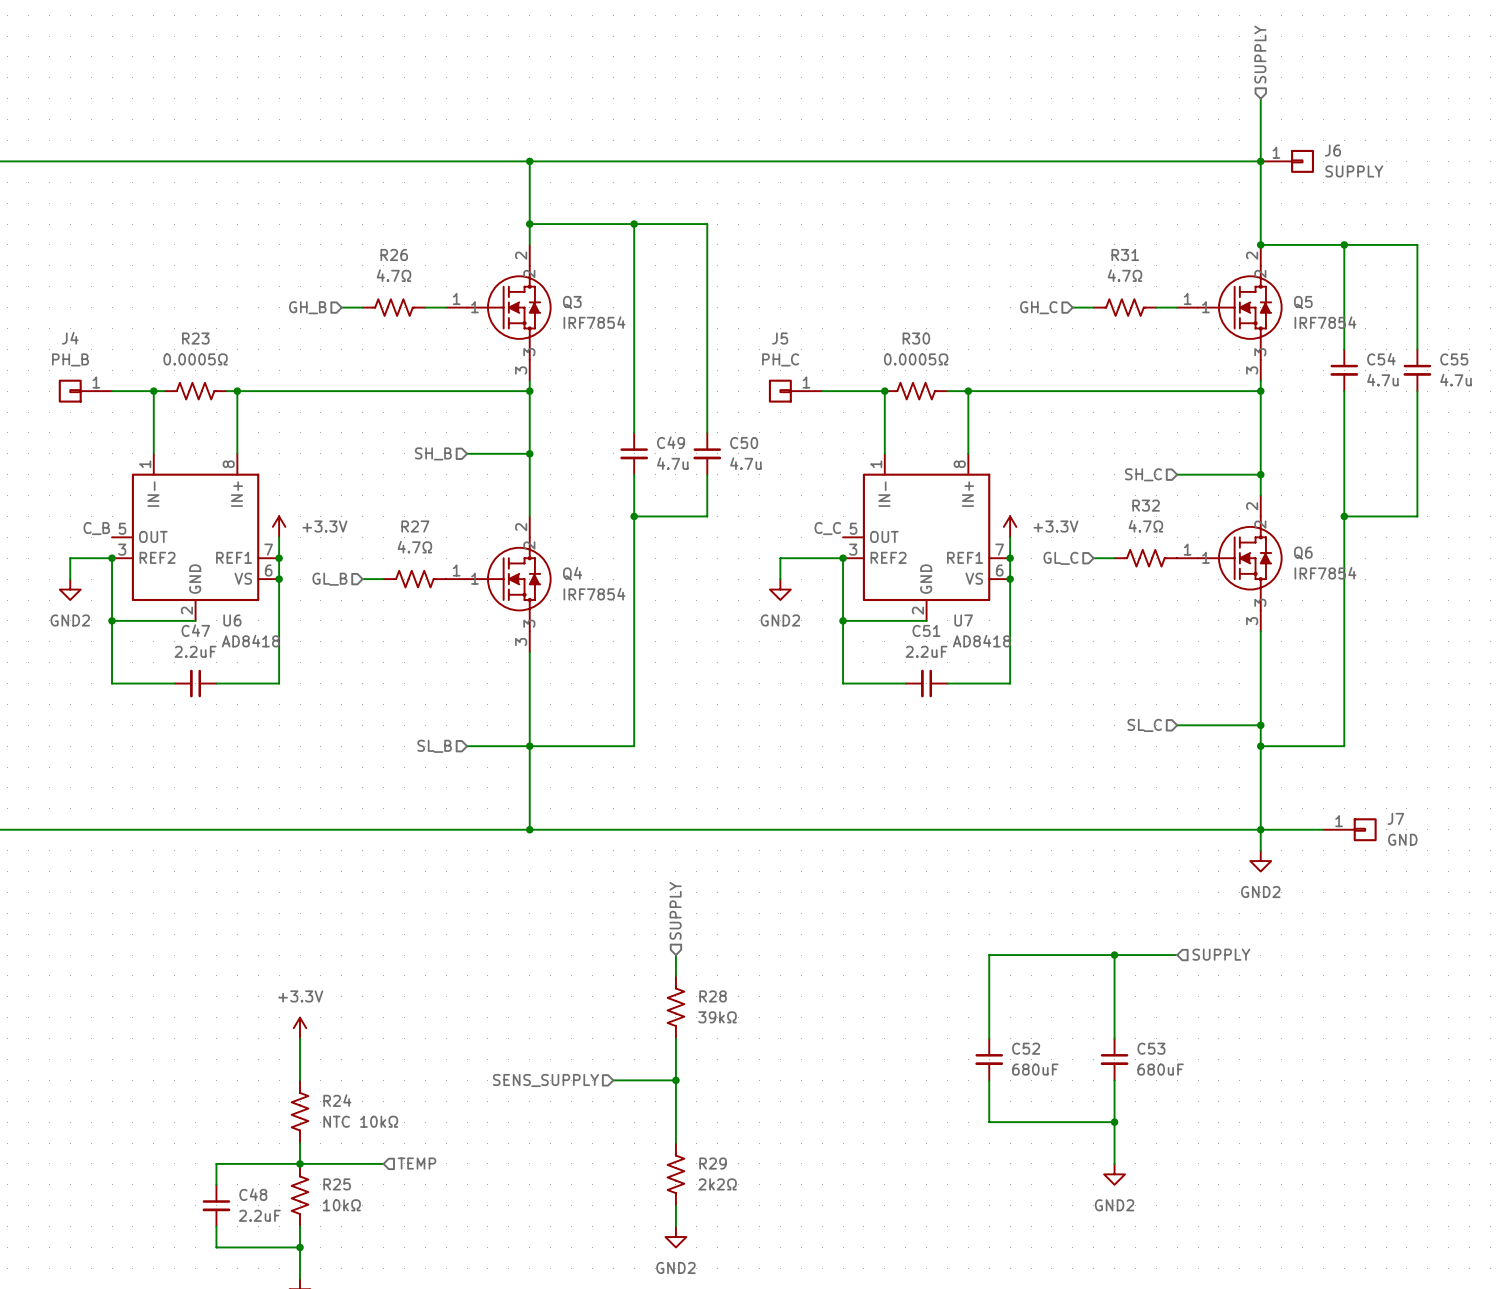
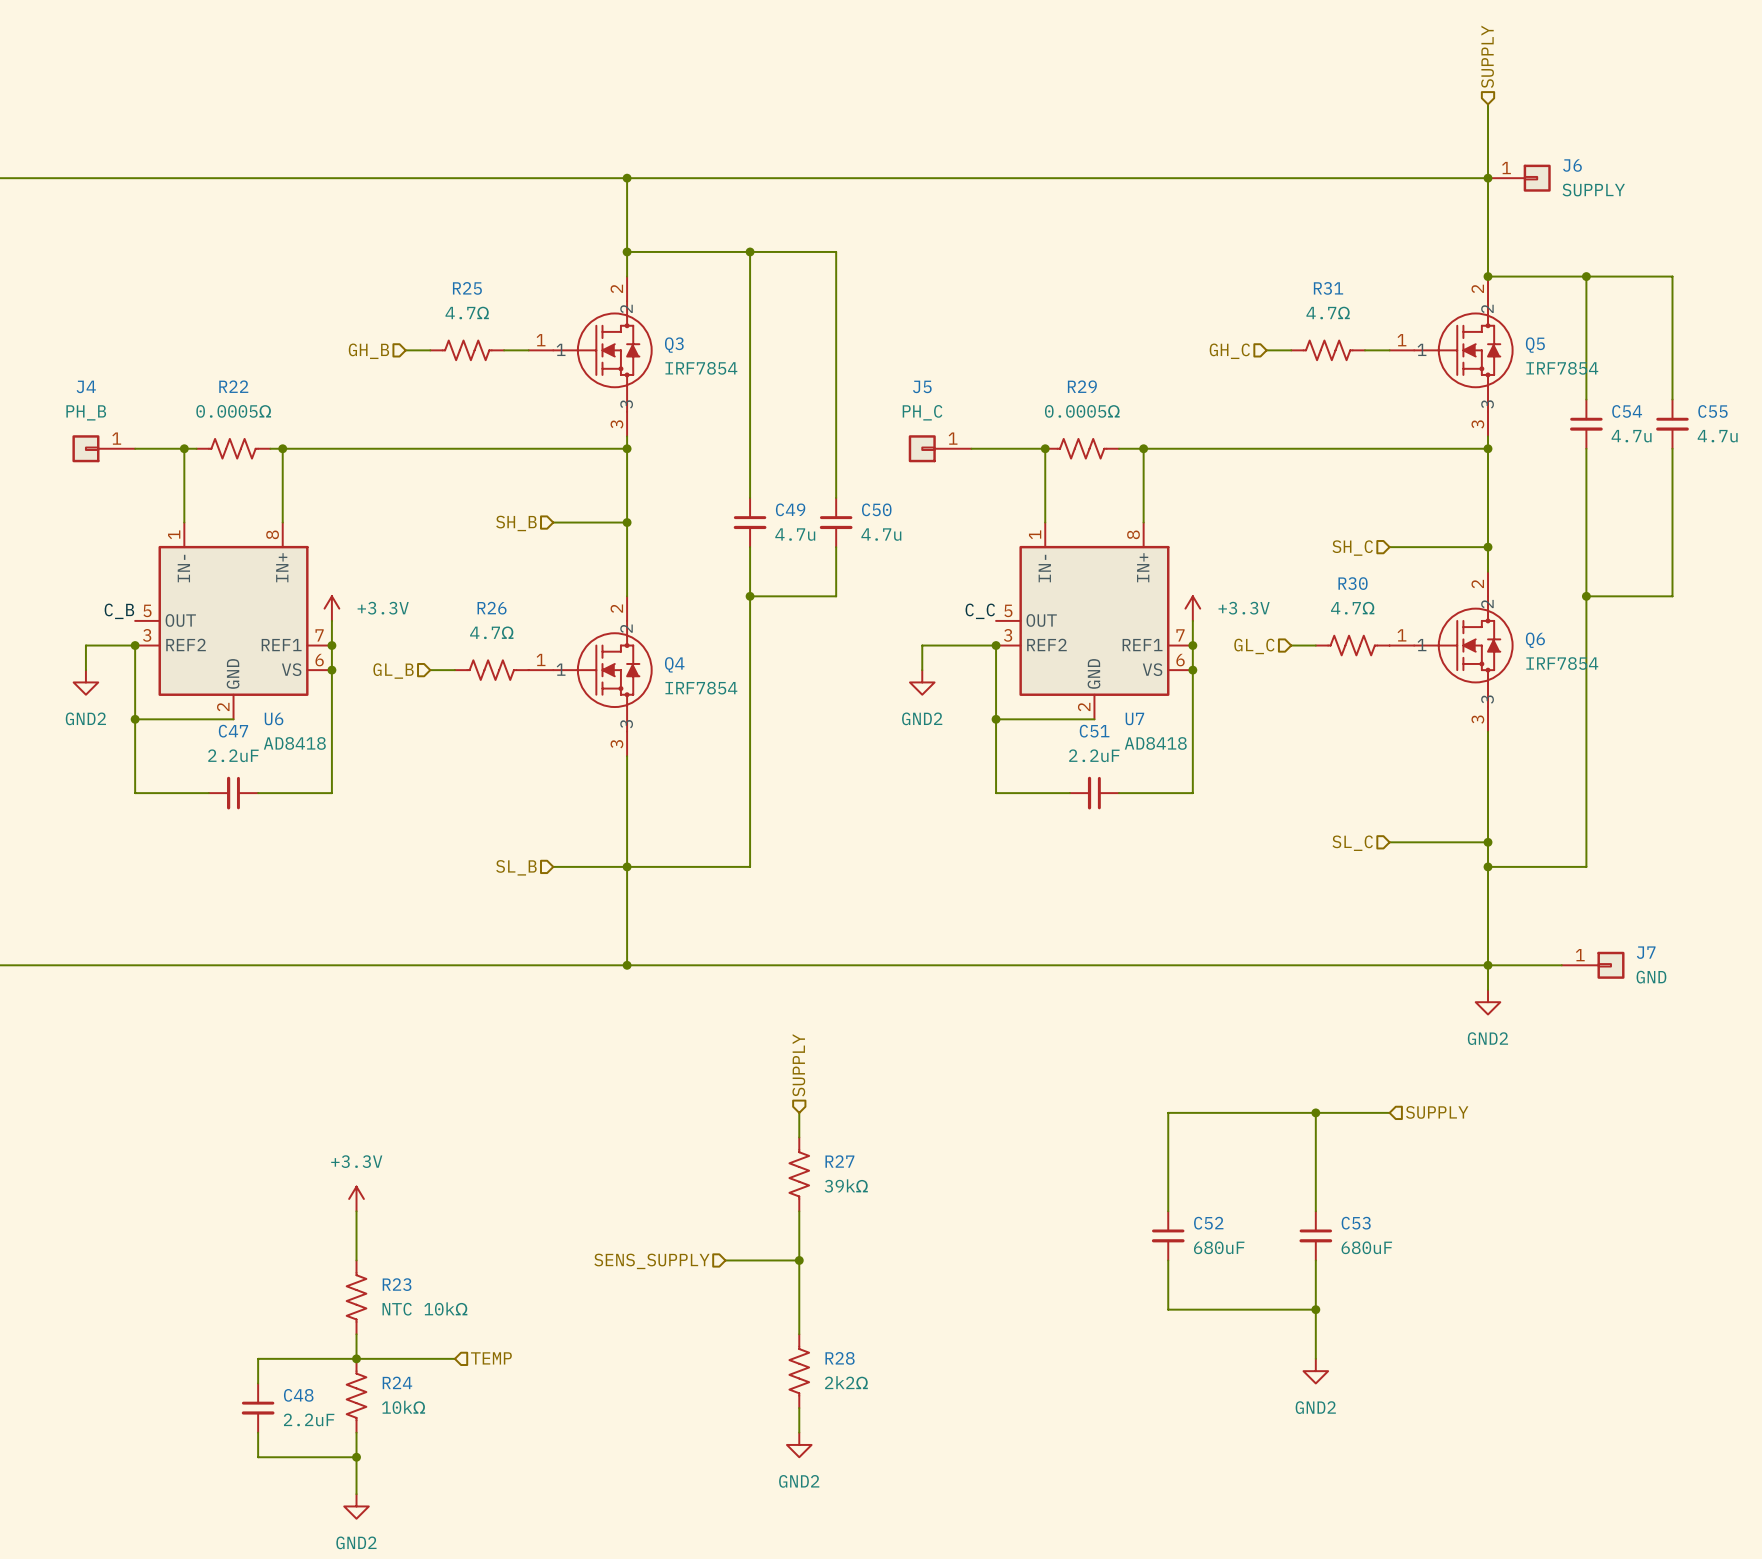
R26 name: R26 (394, 254) -> R25 (467, 288)
R23 name: R23 (195, 338) -> R22 (233, 386)
R30 name: R30 (916, 338) -> R29 (1082, 386)
R32 name: R32 (1146, 505) -> R30 (1353, 583)
R27 name: R27 (415, 526) -> R26 (492, 608)
R28 name: R28 (713, 996) -> R27 (839, 1161)
R24 name: R24 (337, 1100) -> R23 (397, 1284)
R29 name: R29 (713, 1163) -> R28 (840, 1358)
R25 name: R25 (337, 1184) -> R24 (397, 1382)

